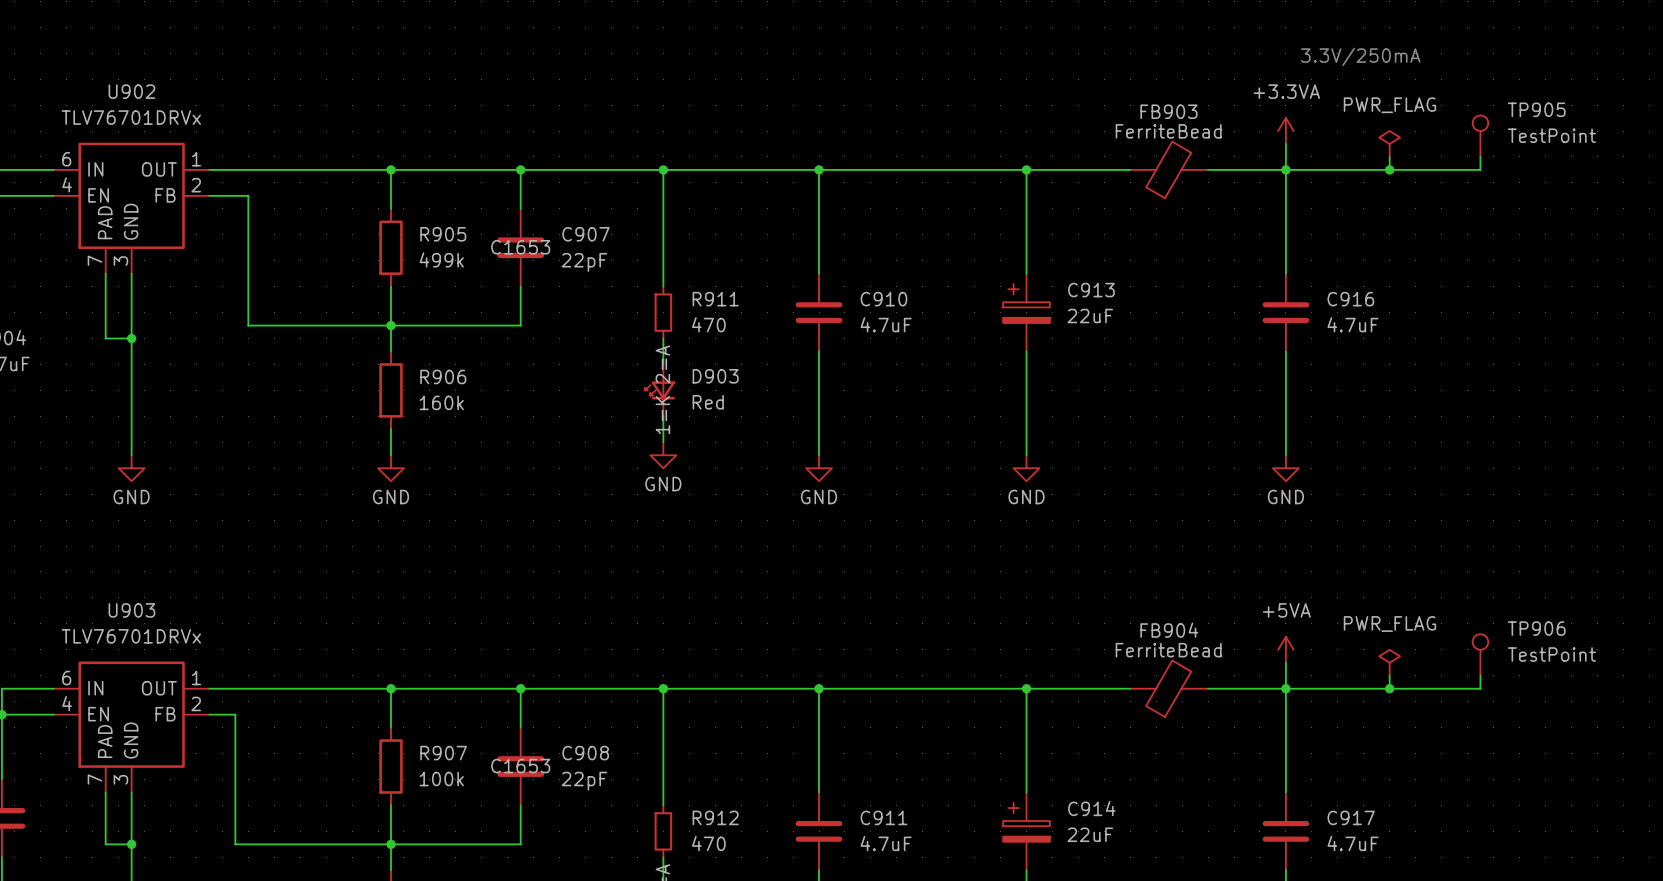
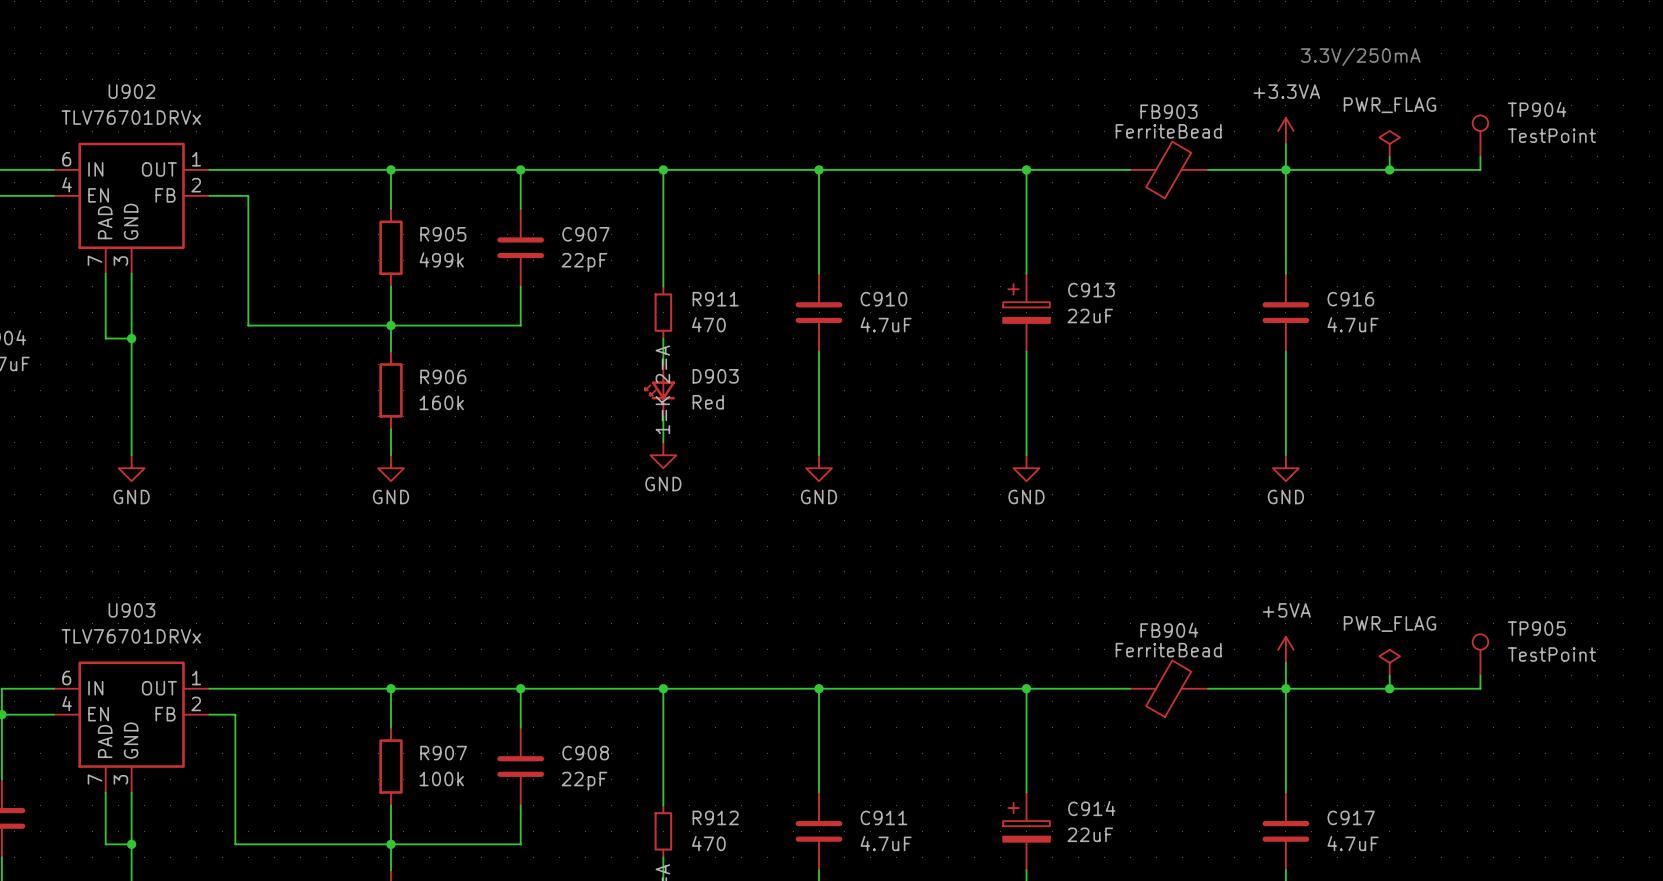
TP905 name: TP905 (1536, 109) -> TP904 (1537, 109)
C907 text: C1653 (520, 247) -> none
TP906 name: TP906 (1536, 628) -> TP905 (1536, 628)
C908 text: C1653 (520, 766) -> none

